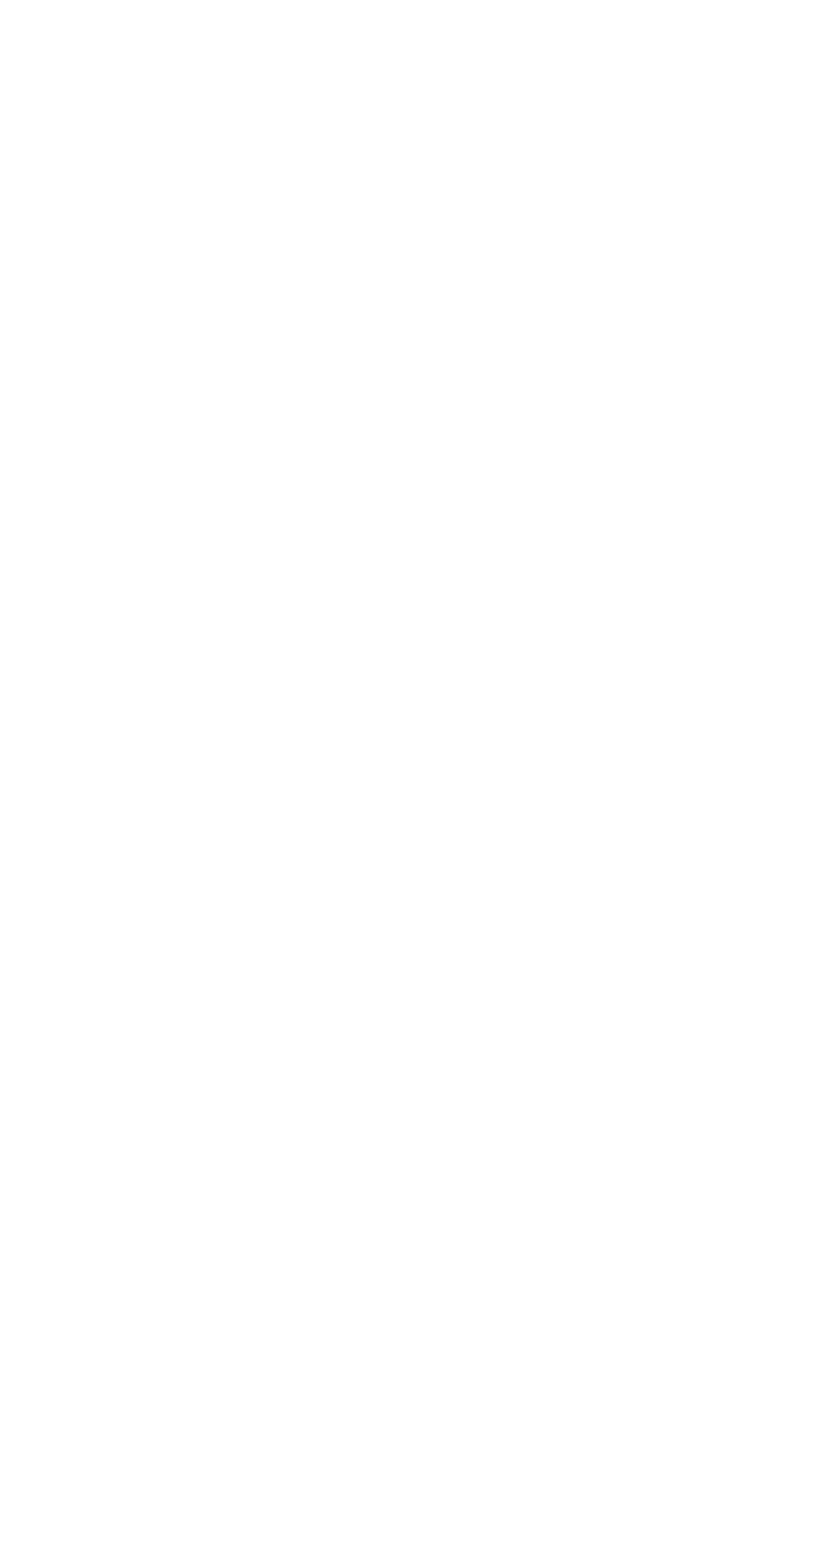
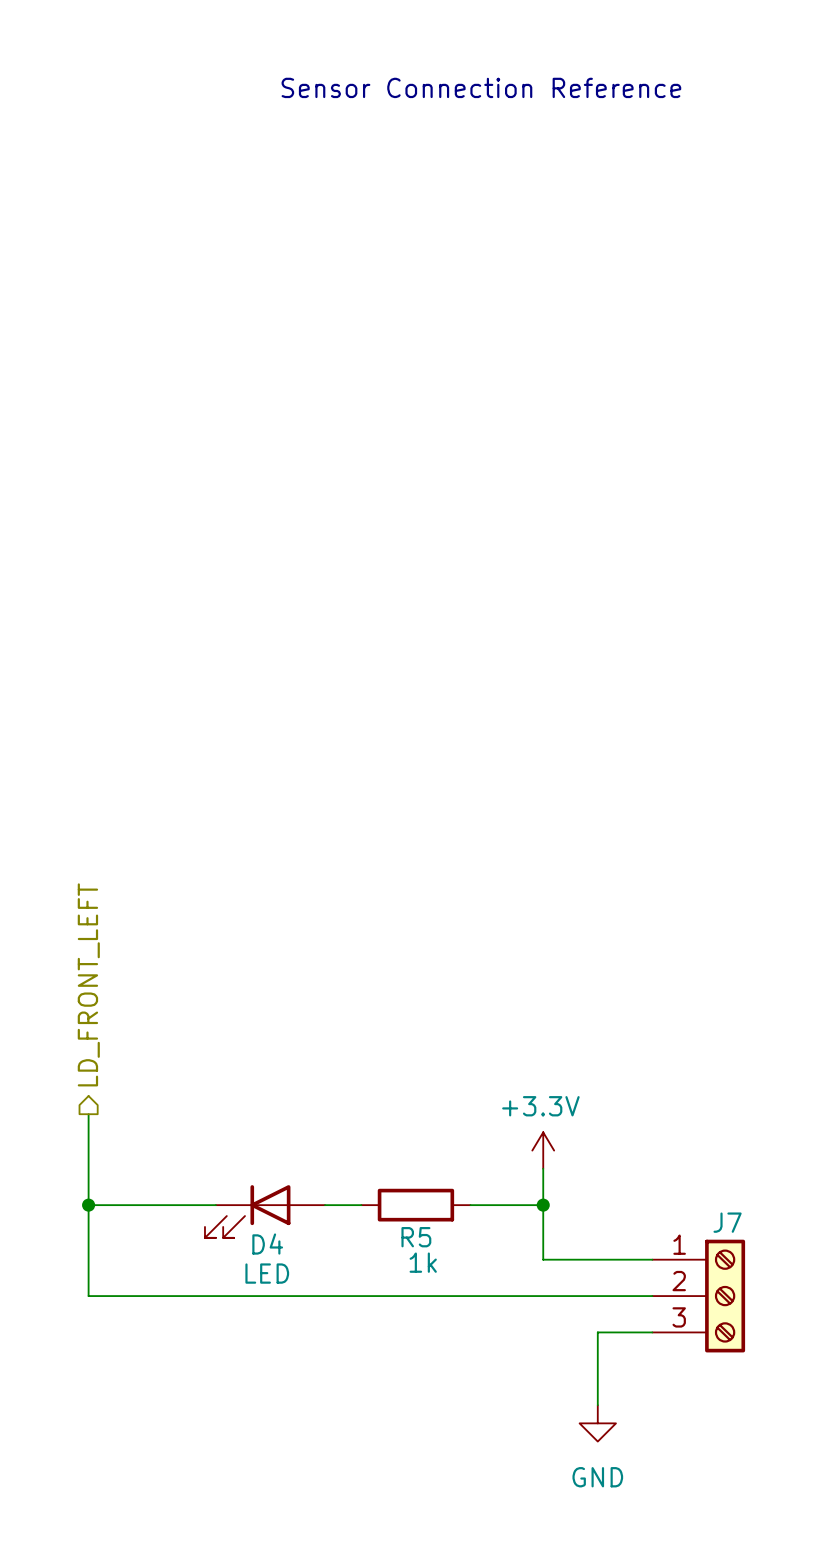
text: none -> Sensor Connection Reference (481, 87)
hierarchical label: none -> LD_FRONT_LEFT (88, 984)
wire: none -> (88, 1114) (88, 1296) (652, 1296)
power symbol: none -> +3.3V (543, 1150)
wire: none -> (543, 1168) (543, 1259) (652, 1259)
wire: none -> (88, 1205) (215, 1205)
junction: none -> (88, 1205)
wire: none -> (325, 1205) (361, 1205)
R5: none -> 1k (415, 1205)
wire: none -> (470, 1205) (543, 1205)
junction: none -> (543, 1205)
D4: none -> LED (265, 1211)
J7: none -> (698, 1296)
wire: none -> (652, 1332) (597, 1332) (597, 1405)
power symbol: none -> GND (597, 1423)

